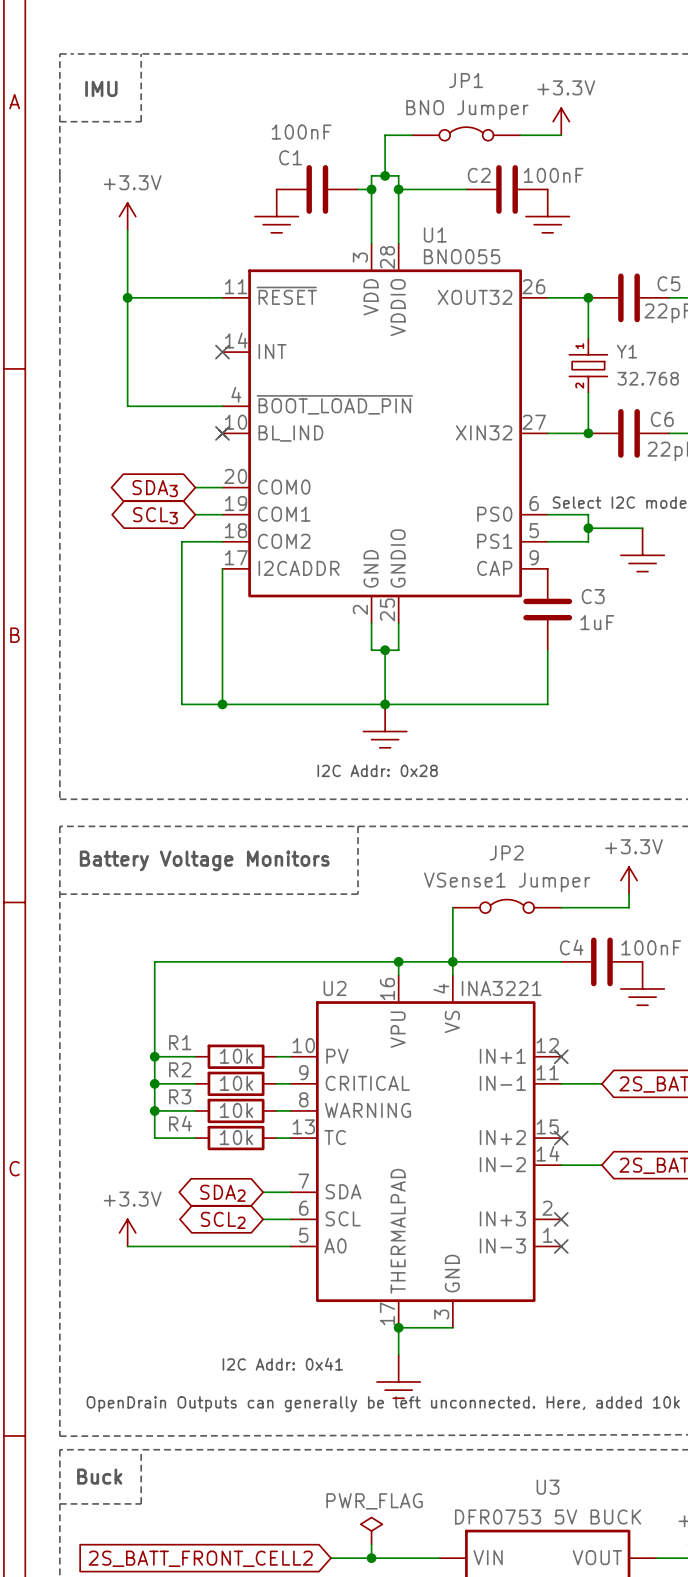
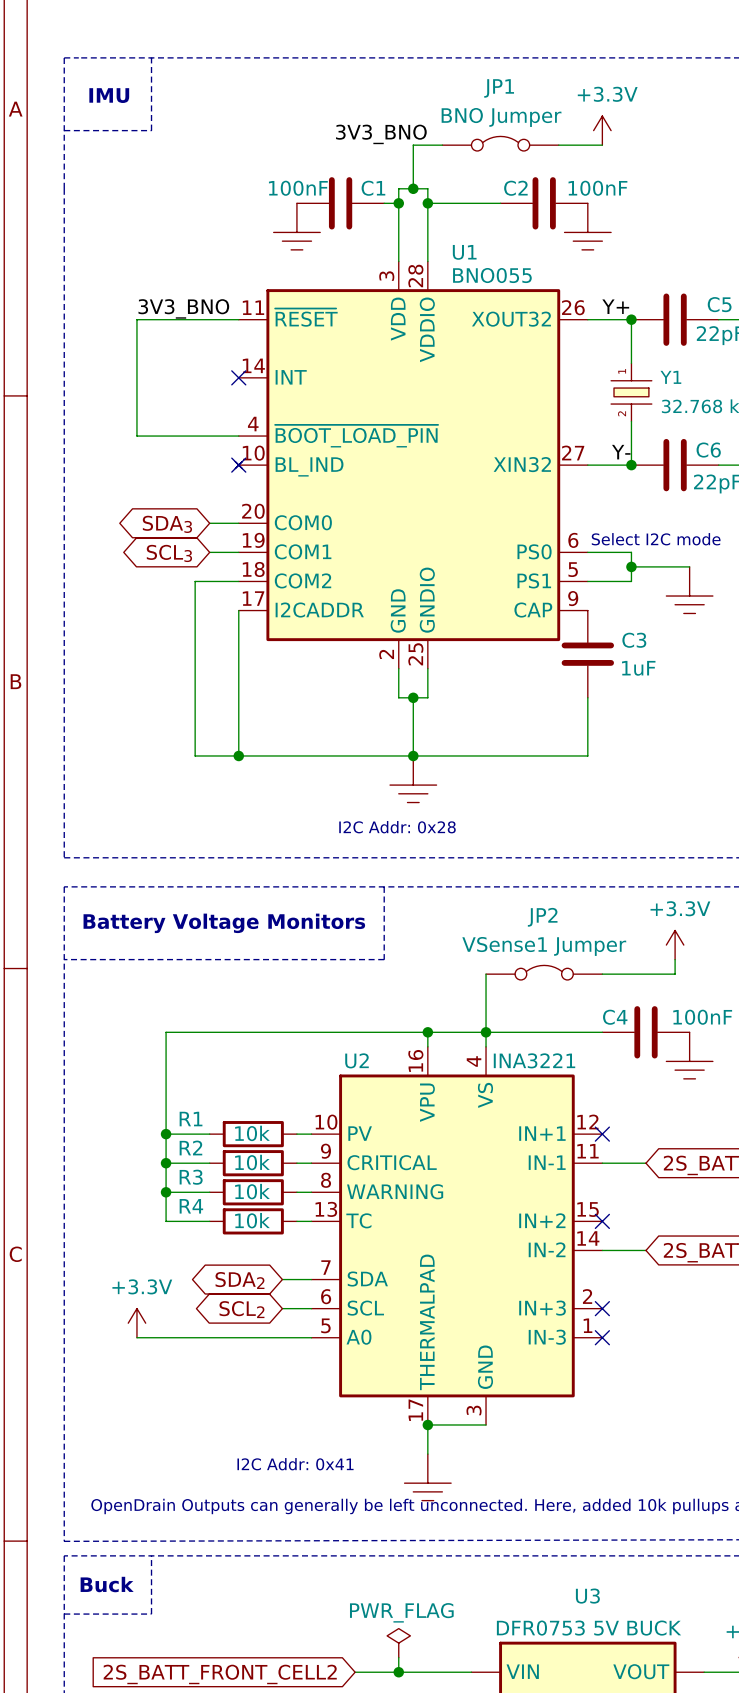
label: none -> 3V3_BNO (381, 134)
C1 value position: 100nF (301, 132) -> 100nF (298, 188)
C1 name position: C1 (290, 157) -> C1 (373, 188)
power symbol: +3.3V (127, 216) -> none
wire: (127, 230) (127, 297) -> none
label: none -> Y+ (615, 306)
label: none -> 3V3_BNO (183, 308)
junction: (127, 297) -> none
label: none -> Y- (621, 452)

